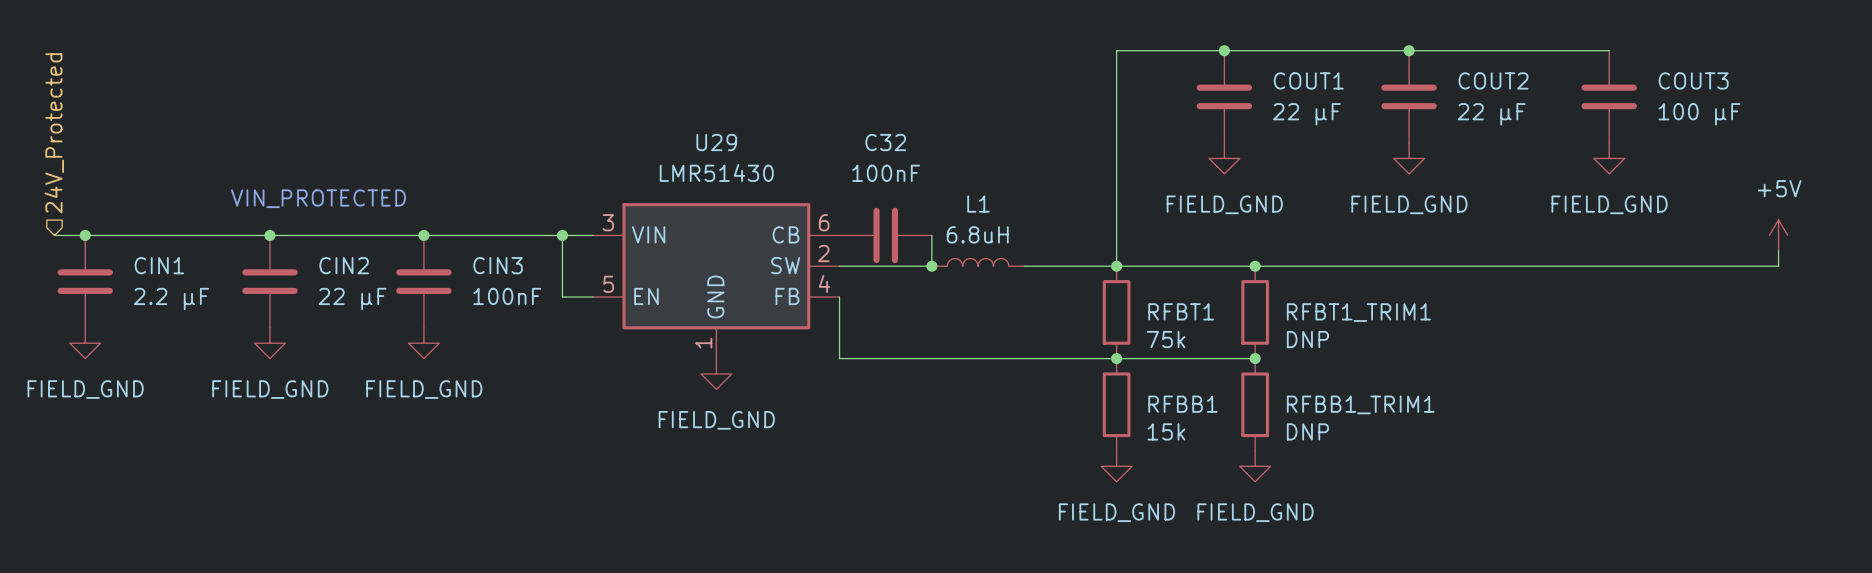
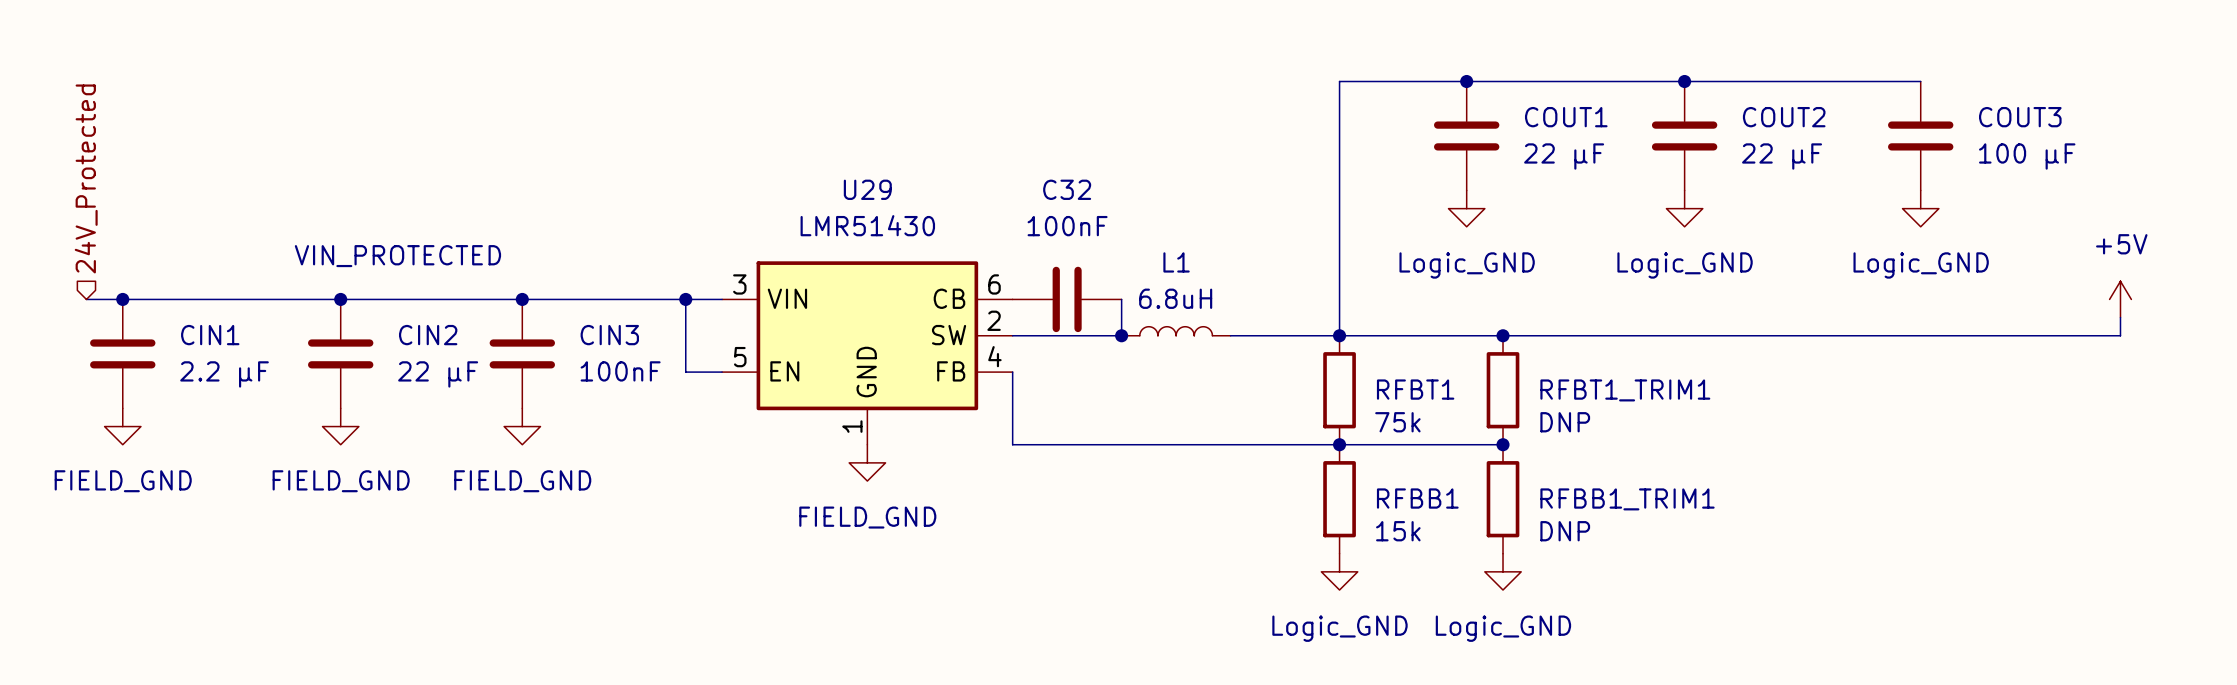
power symbol: FIELD_GND (1224, 158) -> Logic_GND (1466, 208)
power symbol: FIELD_GND (1409, 158) -> Logic_GND (1684, 208)
power symbol: FIELD_GND (1609, 158) -> Logic_GND (1920, 208)
power symbol: FIELD_GND (1116, 466) -> Logic_GND (1339, 571)
power symbol: FIELD_GND (1255, 466) -> Logic_GND (1503, 571)

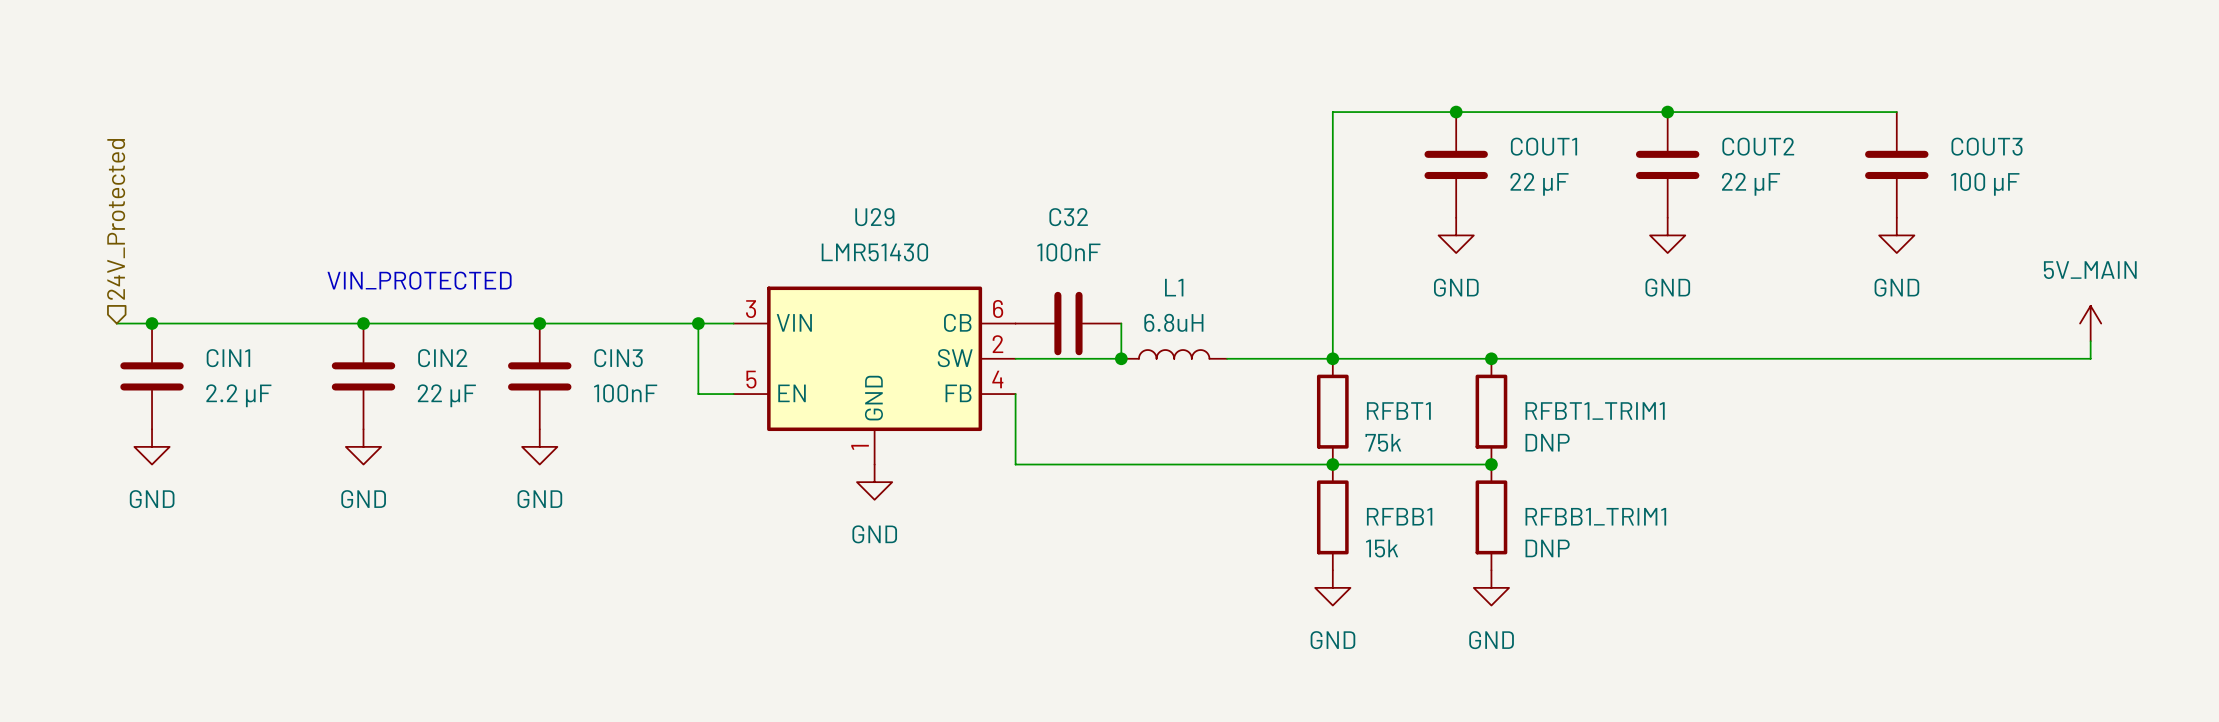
power symbol: Logic_GND (1466, 208) -> GND (1456, 235)
power symbol: Logic_GND (1684, 208) -> GND (1667, 235)
power symbol: Logic_GND (1920, 208) -> GND (1896, 235)
power symbol: +5V (2120, 299) -> 5V_MAIN (2090, 323)
power symbol: FIELD_GND (122, 426) -> GND (152, 446)
power symbol: FIELD_GND (340, 426) -> GND (363, 446)
power symbol: FIELD_GND (522, 426) -> GND (539, 446)
power symbol: FIELD_GND (867, 462) -> GND (874, 482)
power symbol: Logic_GND (1339, 571) -> GND (1332, 587)
power symbol: Logic_GND (1503, 571) -> GND (1491, 587)

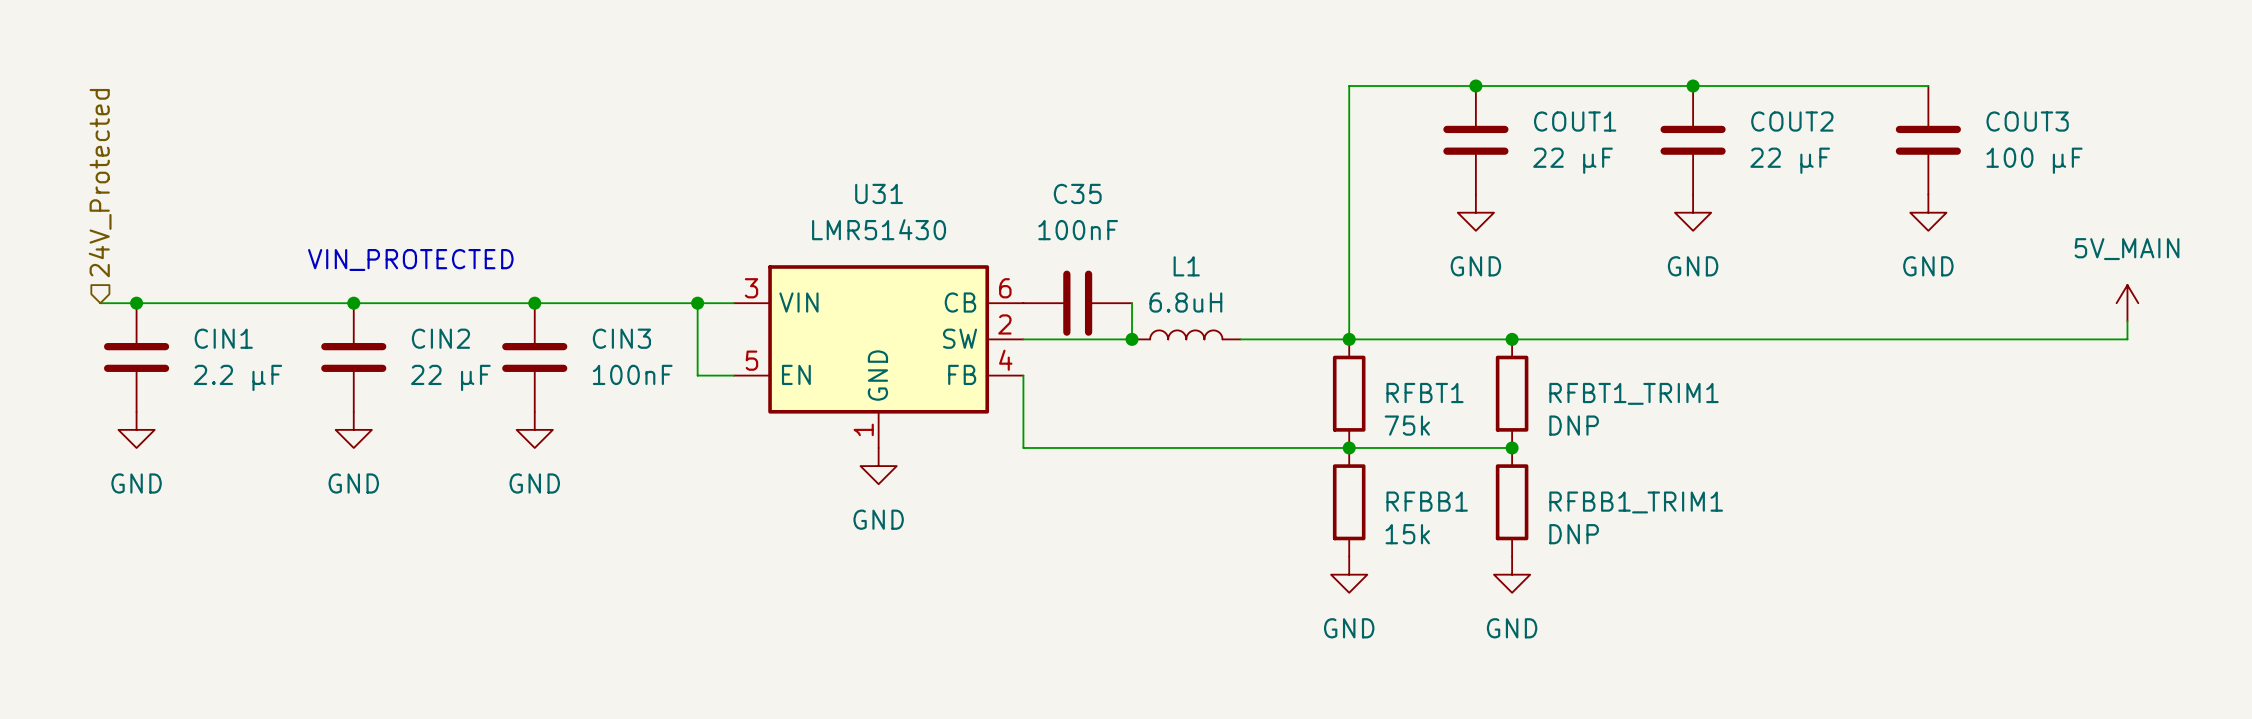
U29 name: U29 (874, 217) -> U31 (879, 193)
C32 name: C32 (1068, 217) -> C35 (1077, 193)

